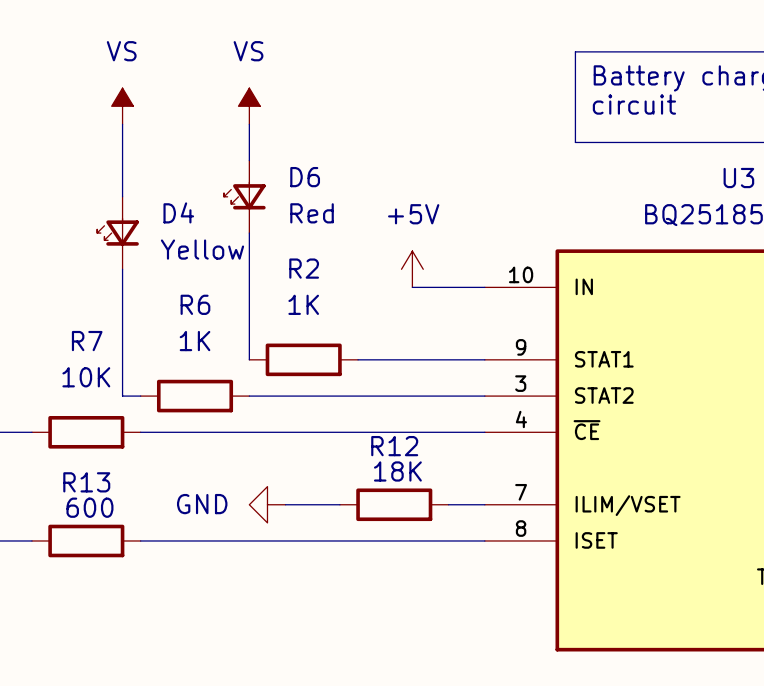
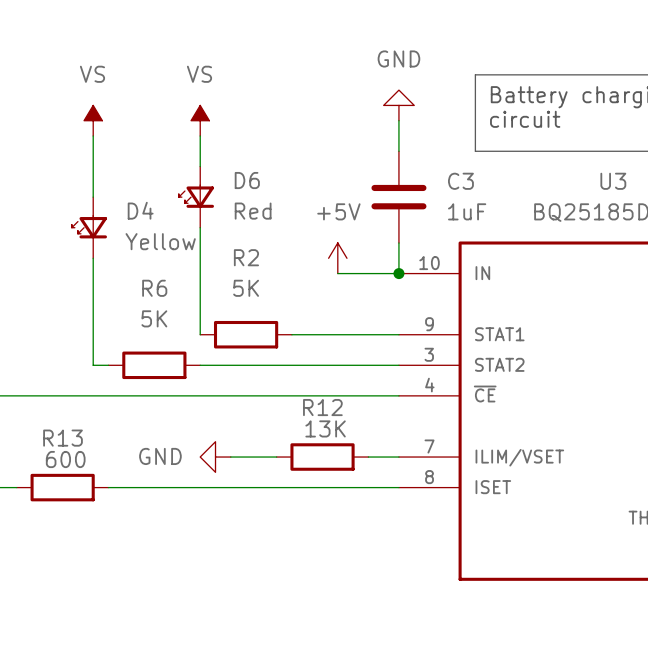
power symbol: none -> GND (398, 105)
wire: none -> (398, 120) (398, 151)
C3: none -> 1uF (398, 197)
wire: none -> (398, 243) (398, 273)
junction: none -> (398, 273)
R2 value: 1K (303, 304) -> 5K (246, 288)
R6 value: 1K (195, 341) -> 5K (154, 318)
wire: none -> (16, 395) (108, 395)
R7: 10K (86, 432) -> none
R12 value: 18K (397, 471) -> 13K (325, 428)

